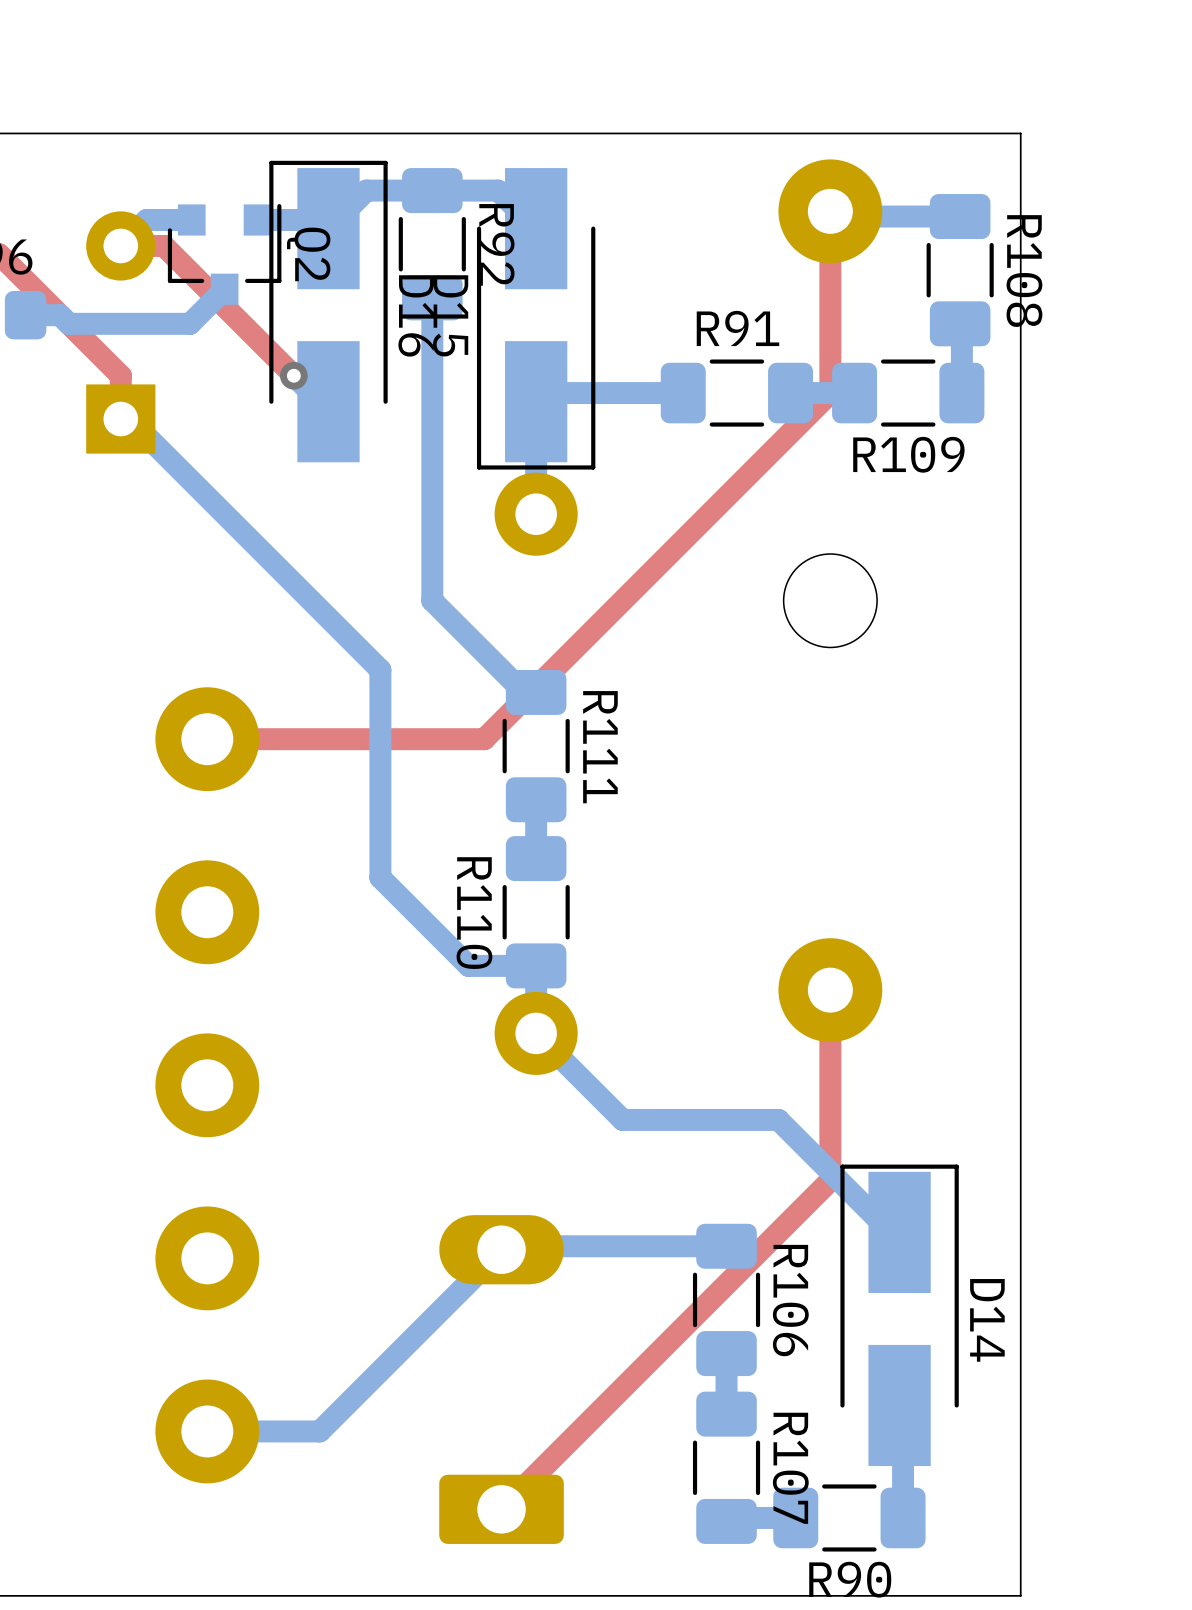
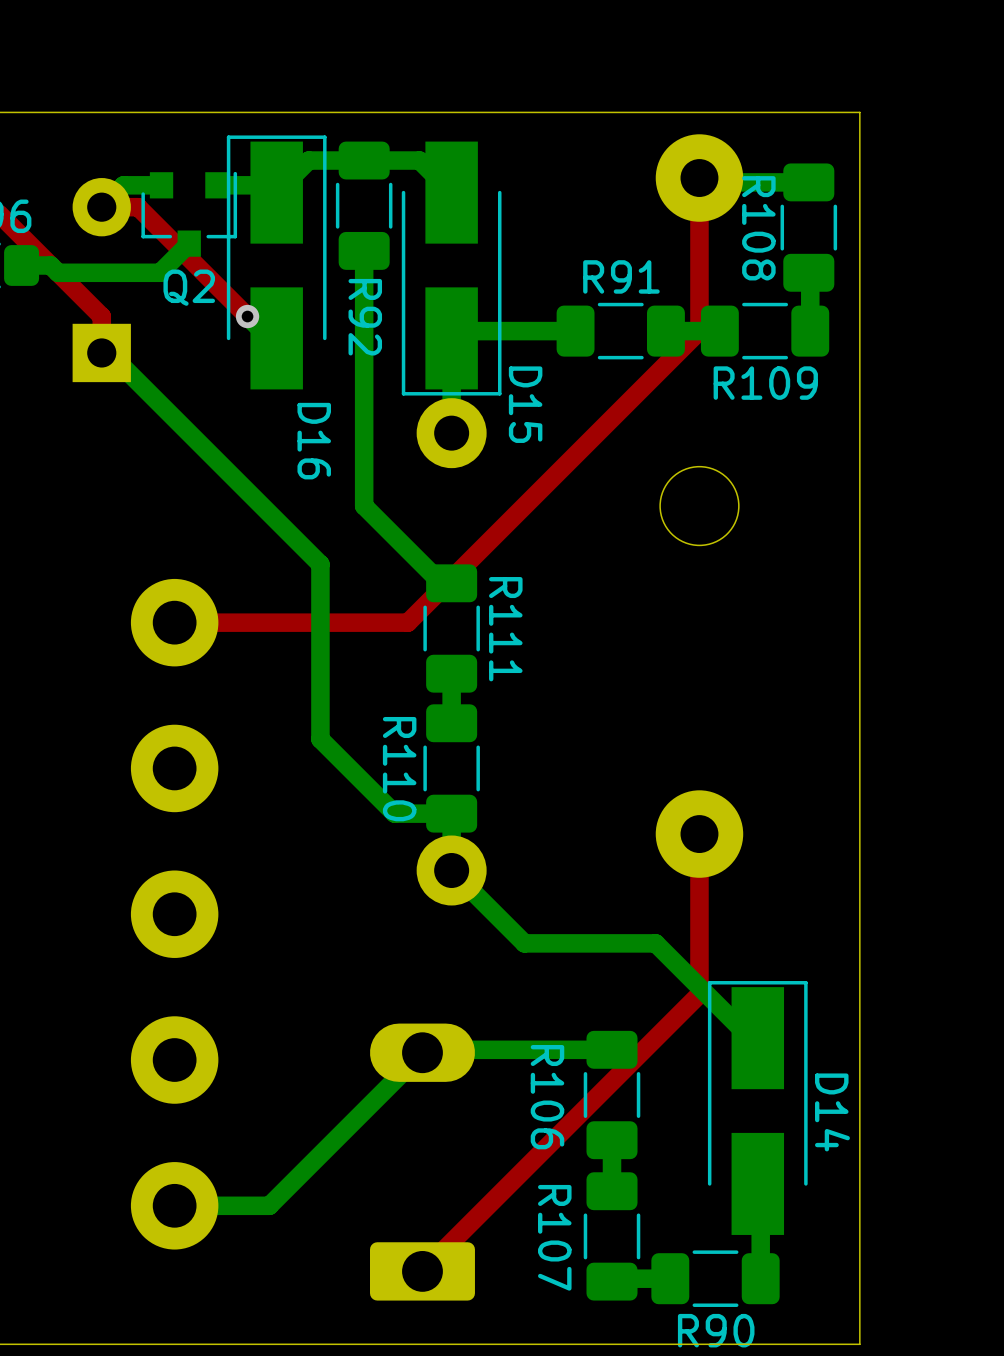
R92 name position: R92 (496, 244) -> R92 (365, 317)
Q2 name rotation: 0° (308, 254) -> 90° counterclockwise (189, 287)
Q2 name position: Q2 (308, 254) -> Q2 (189, 287)
R108 name position: R108 (1024, 271) -> R108 (758, 228)
D16 name position: D16 (416, 315) -> D16 (314, 441)
D15 name position: D15 (450, 315) -> D15 (525, 404)
R106 name position: R106 (790, 1300) -> R106 (547, 1097)
R107 name position: R107 (790, 1468) -> R107 (554, 1237)

